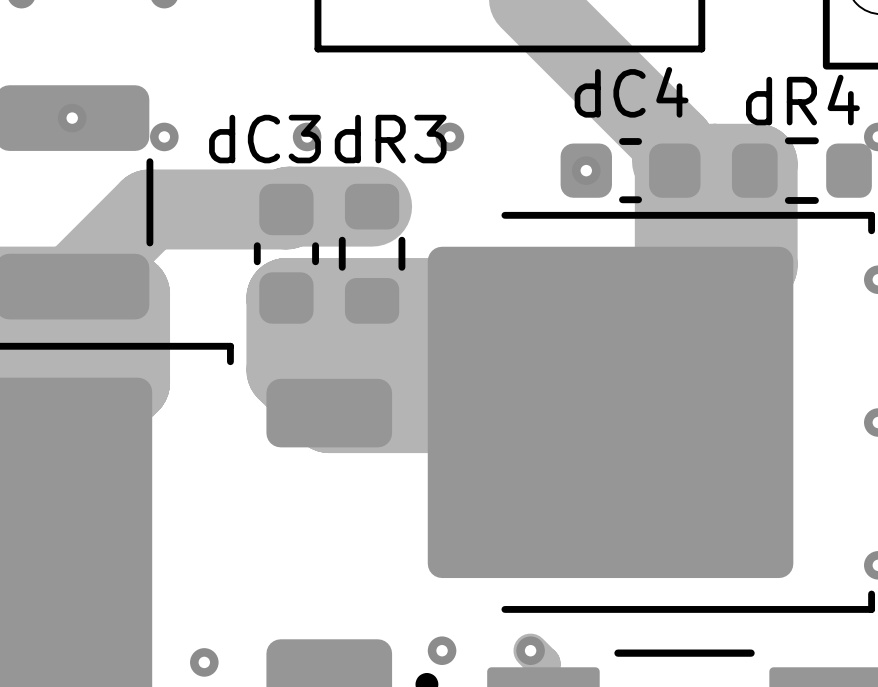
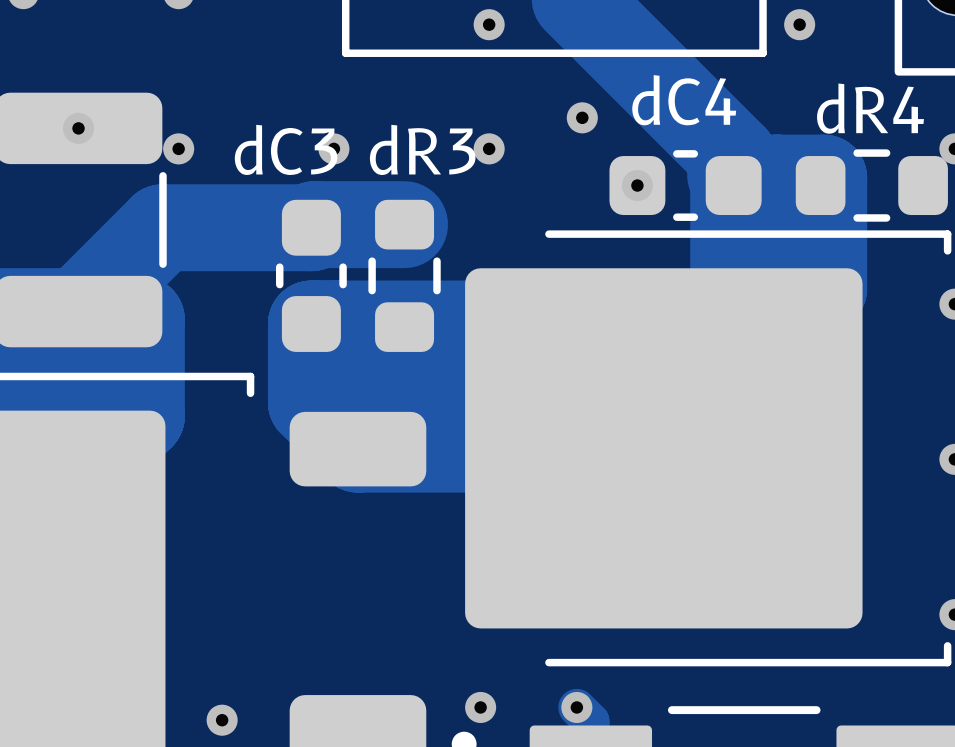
via: none -> (489, 24)
via: none -> (799, 24)
via: none -> (582, 117)

